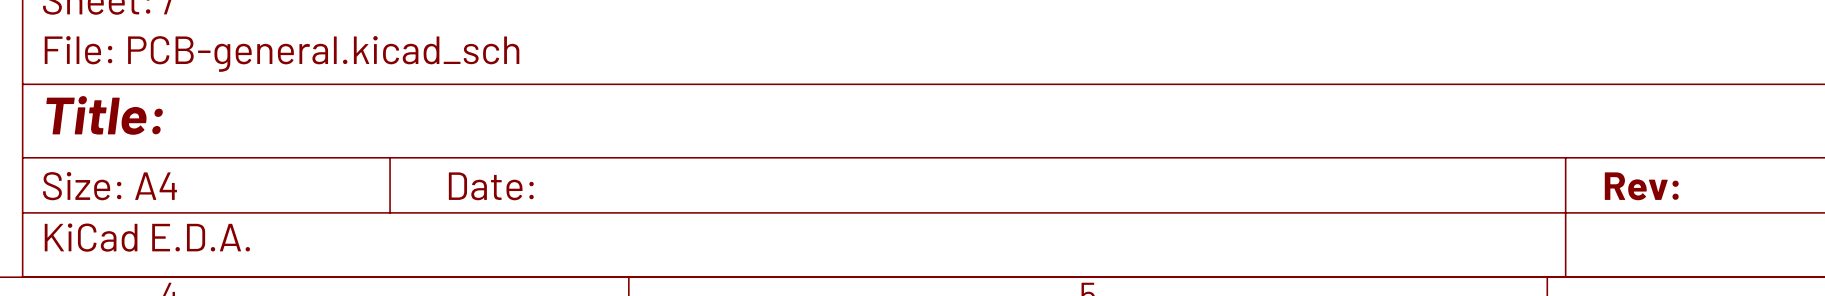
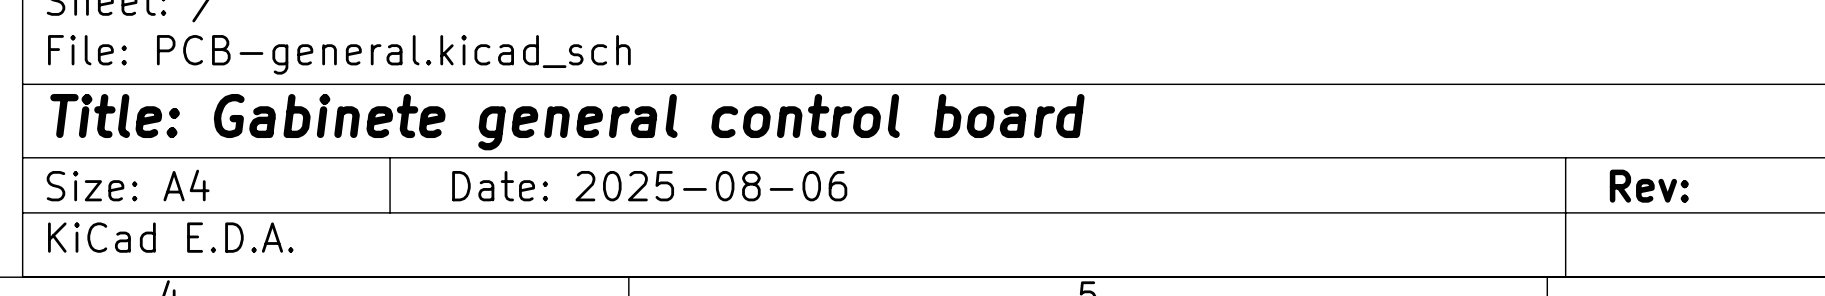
title block: Title: (104, 115) -> Title: Gabinete general control board (567, 122)
title block: Date: (491, 186) -> Date: 2025-08-06 (649, 186)

